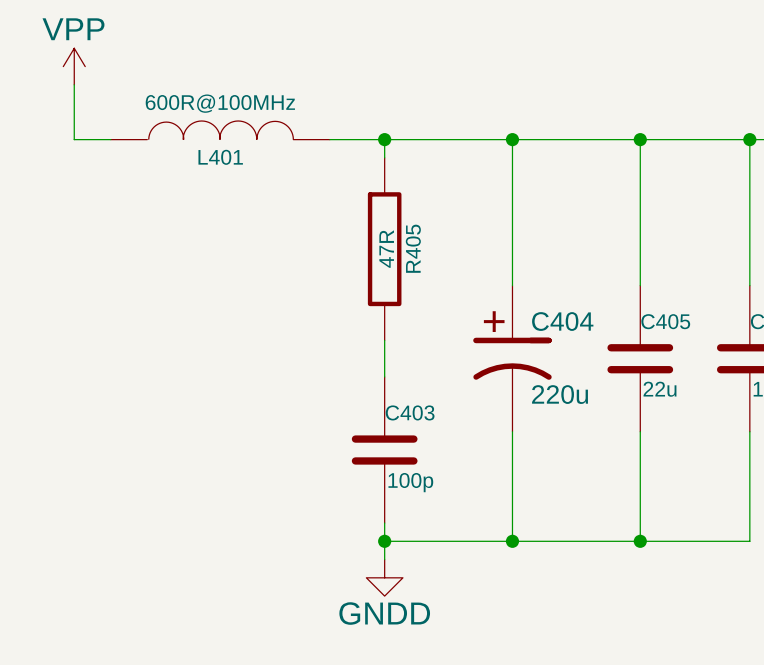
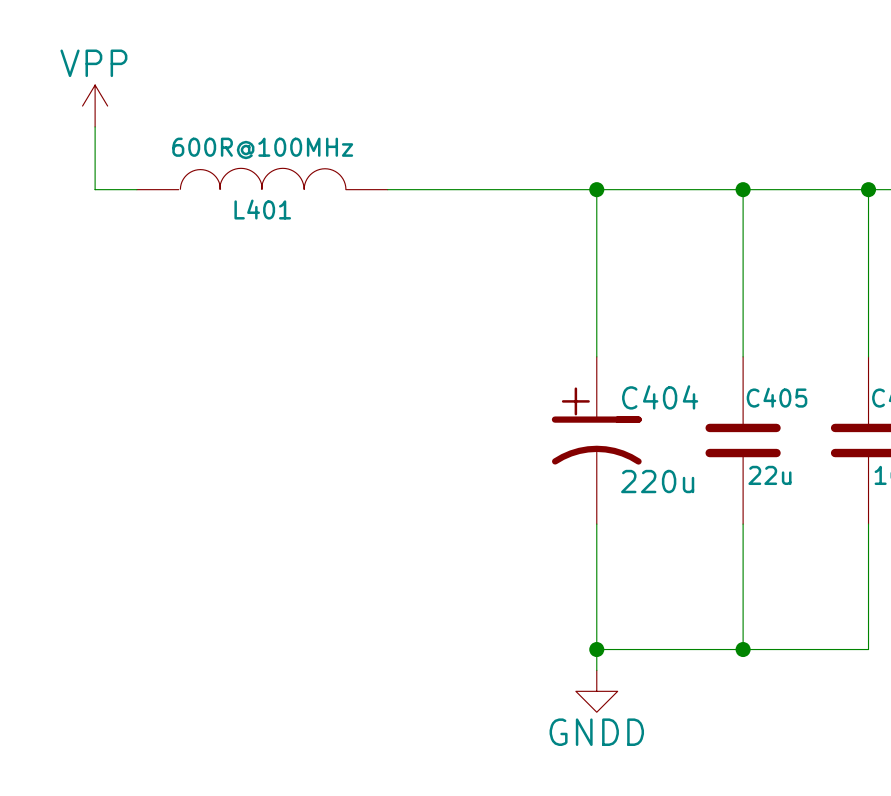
wire: (384, 139) (384, 157) -> none
junction: (384, 139) -> none
R405: 47R (384, 249) -> none
wire: (384, 340) (384, 376) -> none
C403: 100p (384, 450) -> none
wire: (384, 523) (384, 559) -> none
wire: (384, 541) (512, 541) -> (596, 670) (596, 649)
junction: (384, 541) -> none
power symbol position: GNDD (384, 577) -> GNDD (596, 691)

